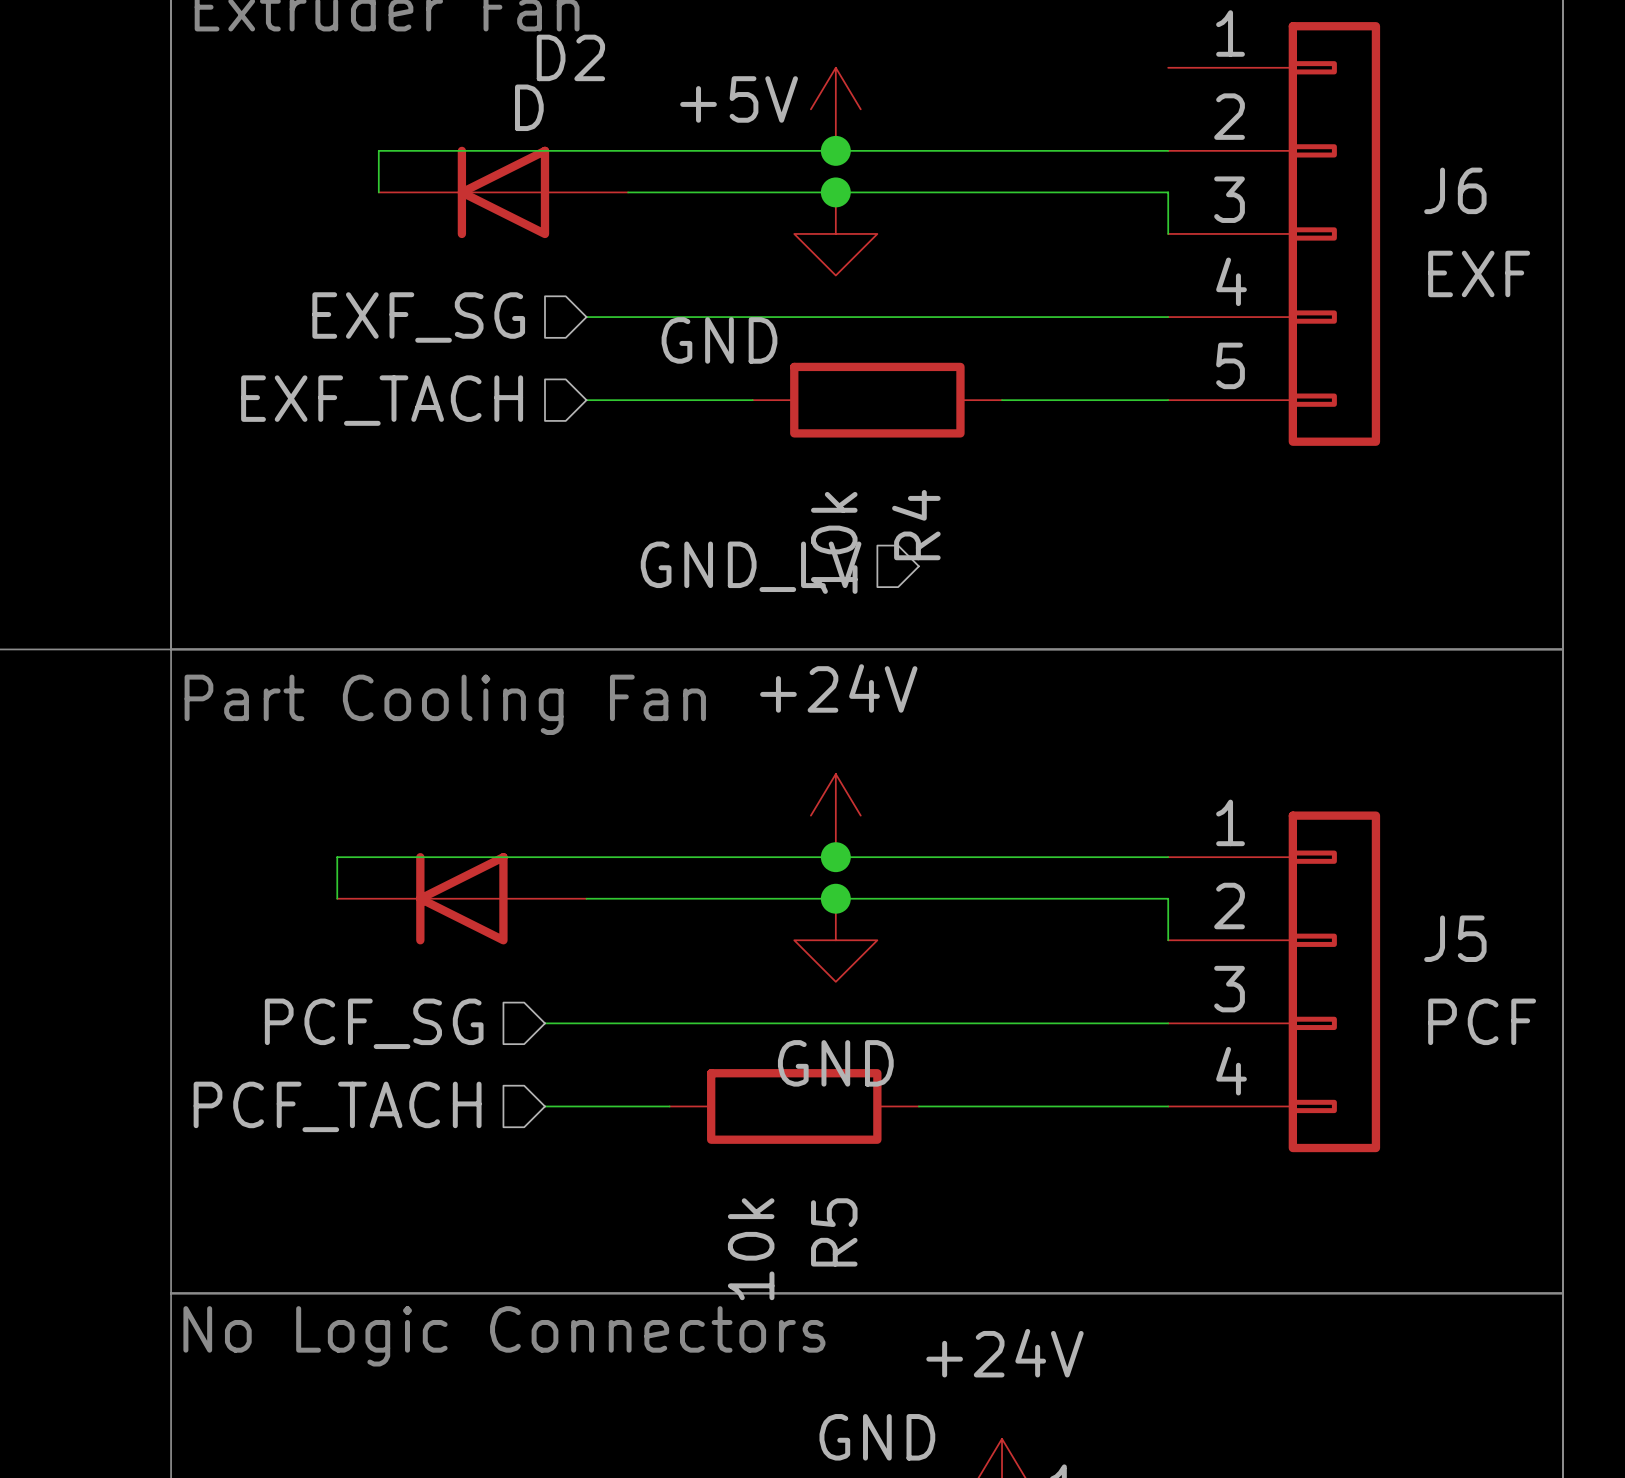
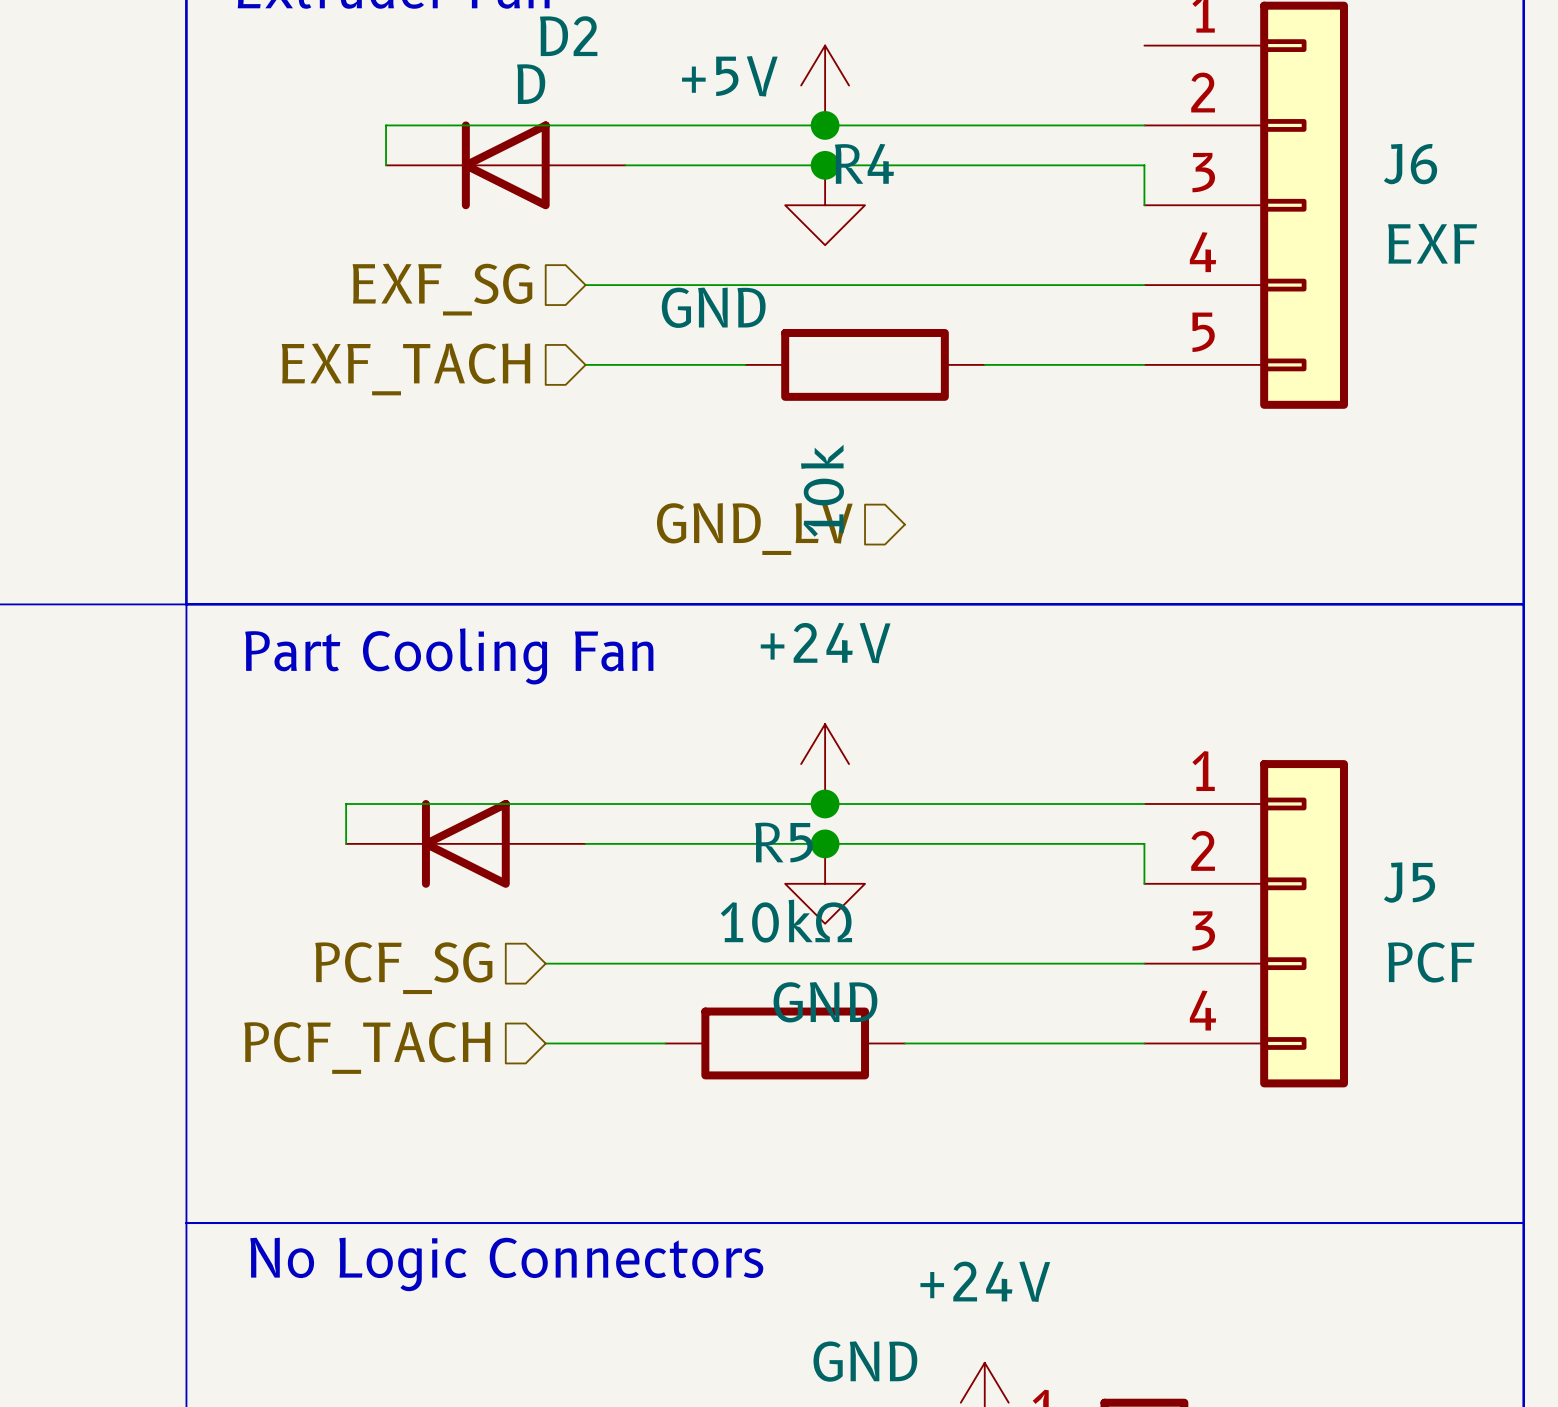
R4 name rotation: 0° (916, 525) -> 90° clockwise (864, 163)
R4 name position: R4 (916, 525) -> R4 (864, 163)
R5 name rotation: 0° (834, 1232) -> 90° clockwise (783, 842)
R5 name position: R5 (834, 1232) -> R5 (783, 842)
R5 value: 10k (751, 1249) -> 10kΩ (786, 921)

